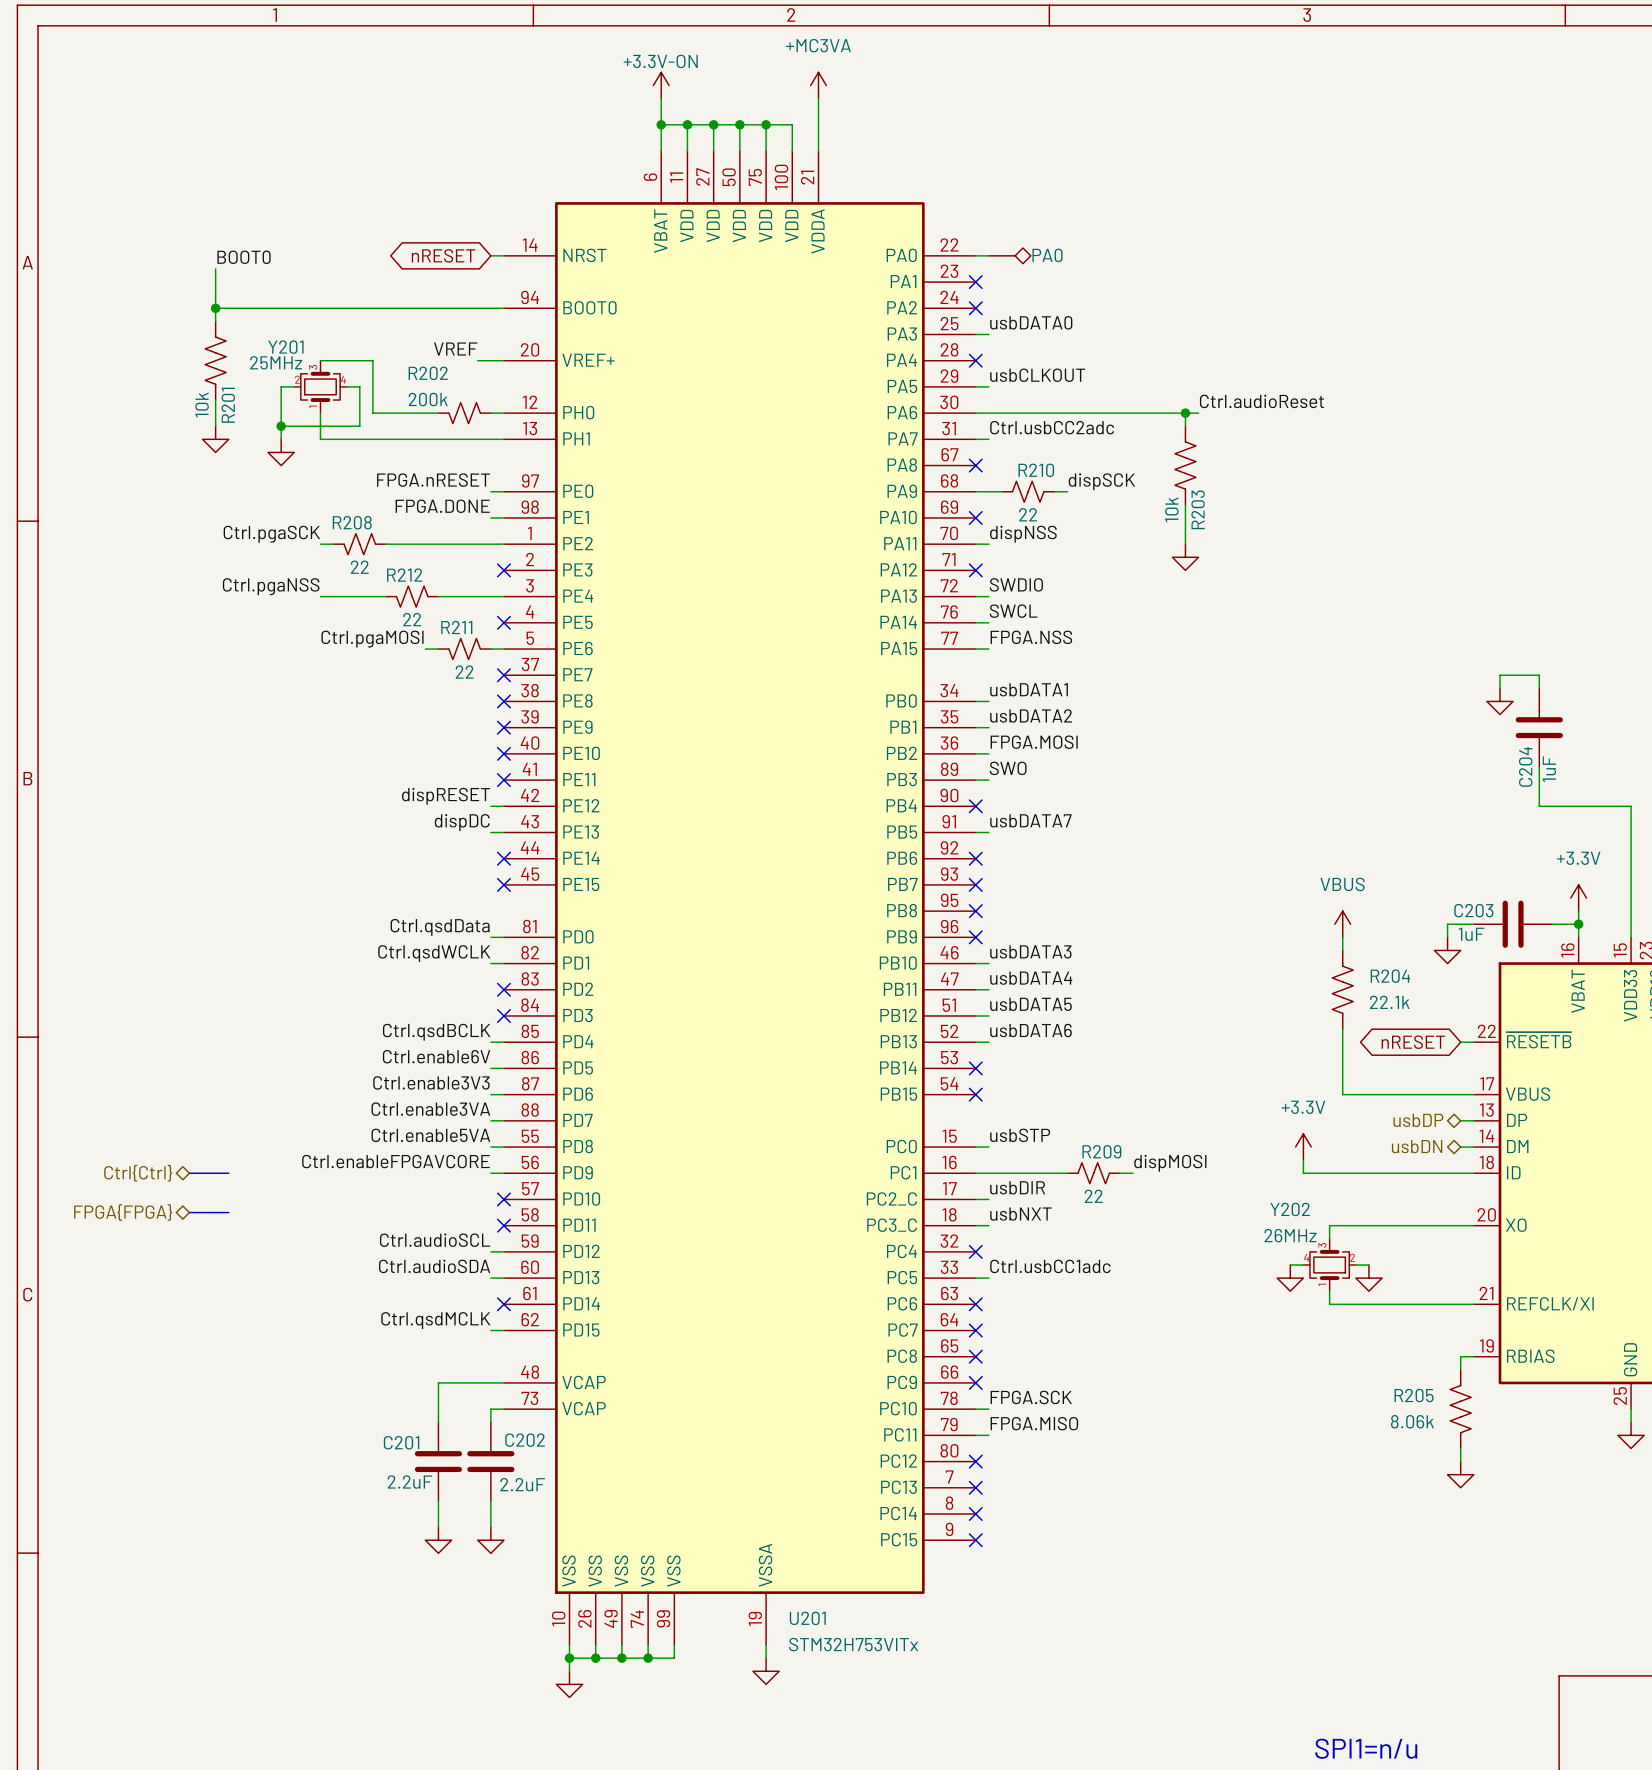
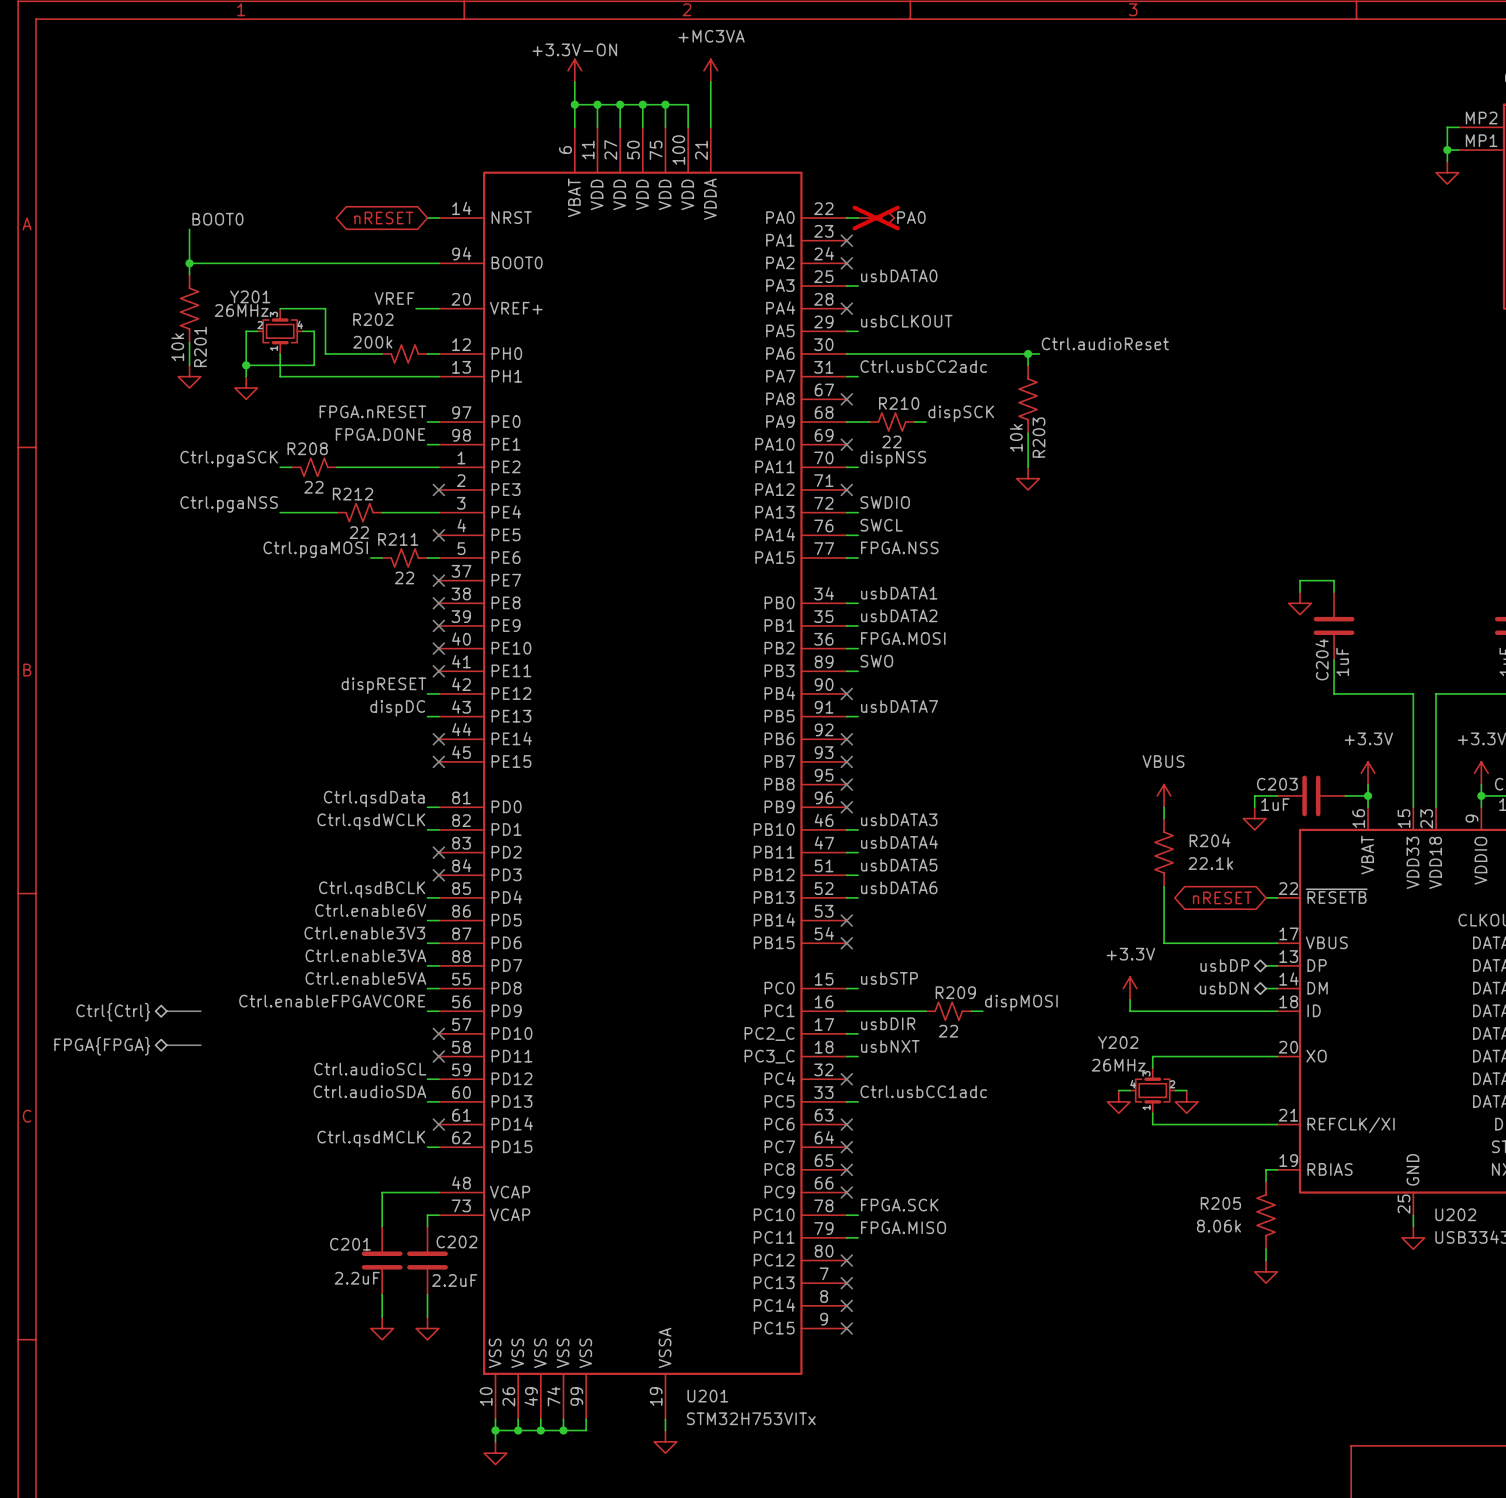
part do-not-place cross: none -> (876, 218)
Y201 value: 25MHz (276, 362) -> 26MHz (241, 310)

